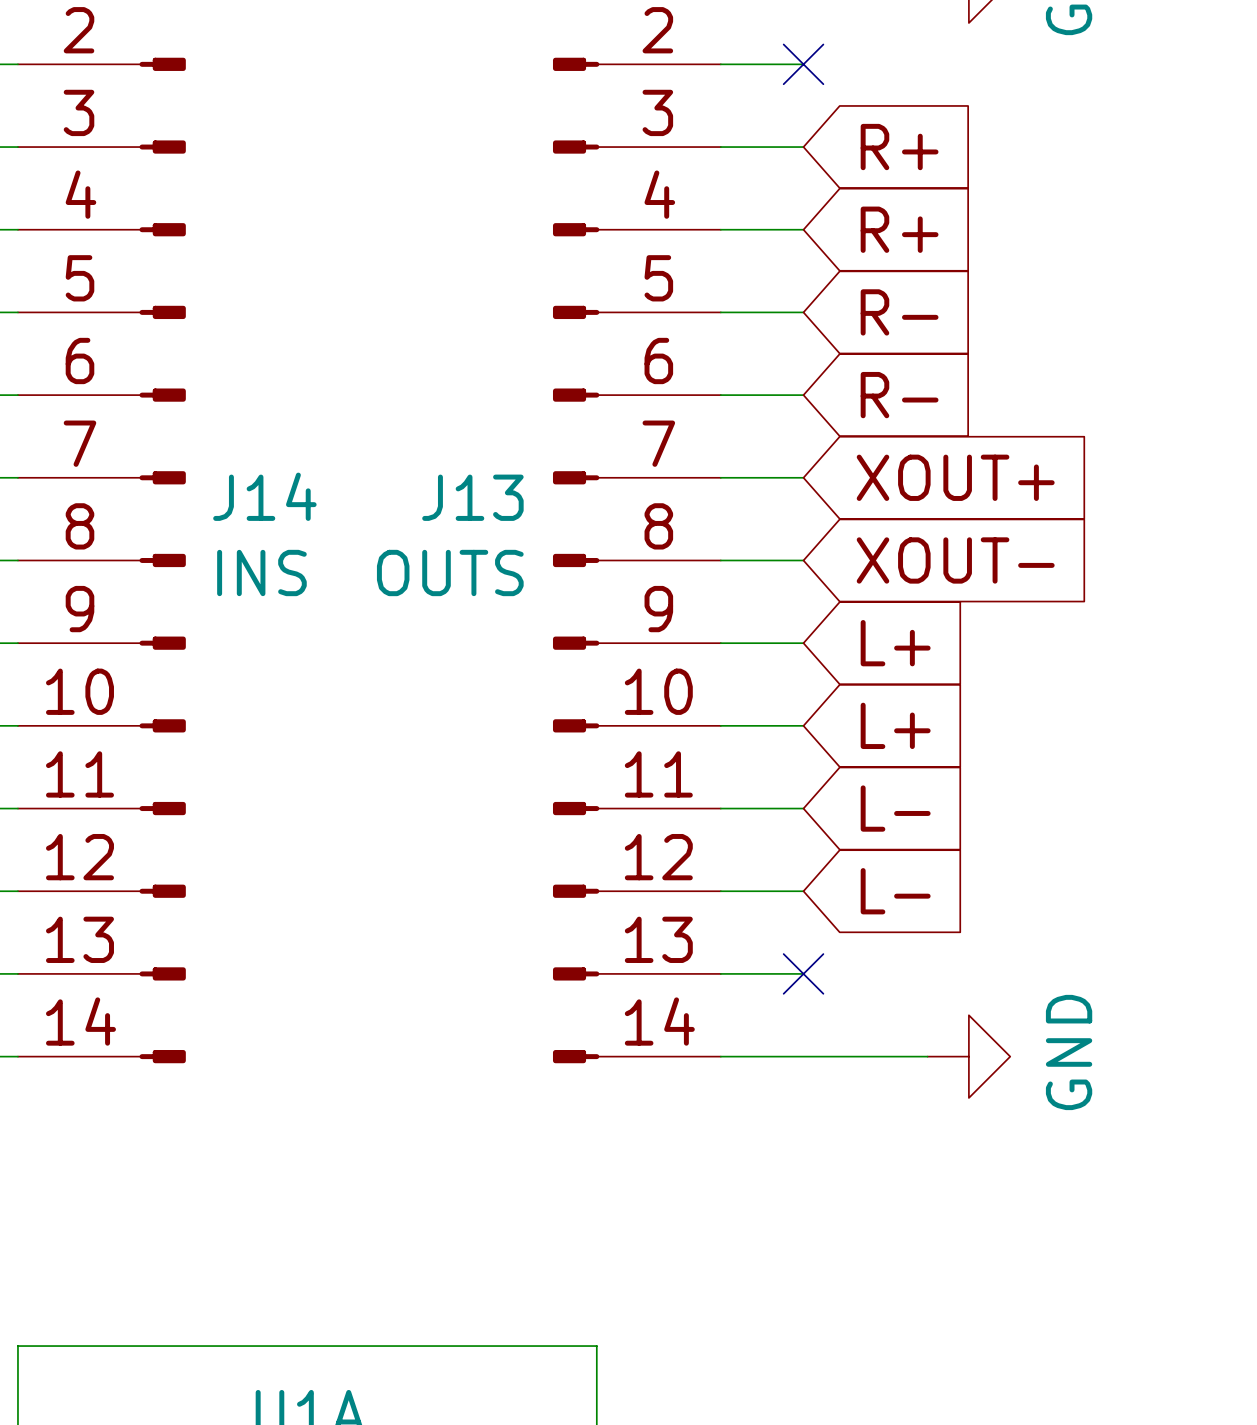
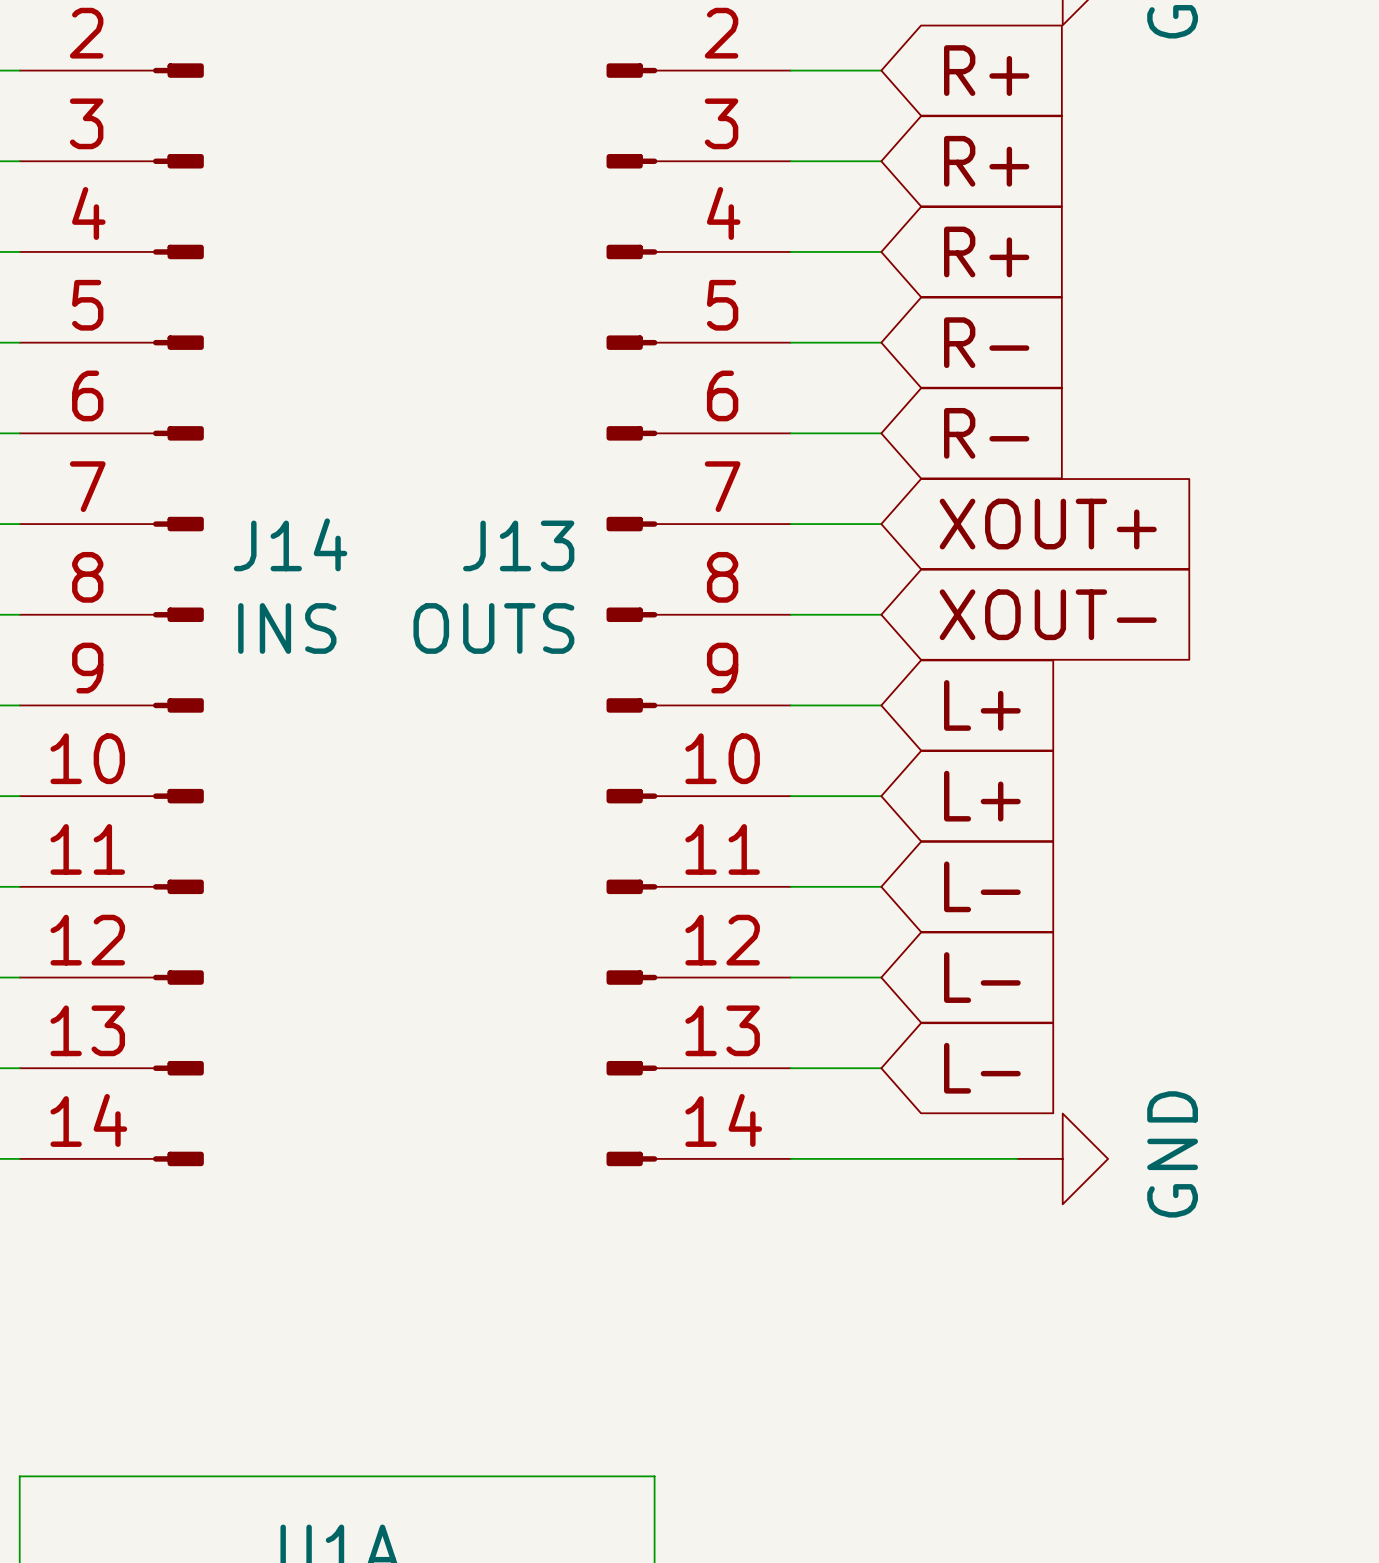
no-connect mark: (803, 64) -> none
global label: none -> R+ (986, 70)
no-connect mark: (803, 973) -> none
global label: none -> L- (982, 1068)

